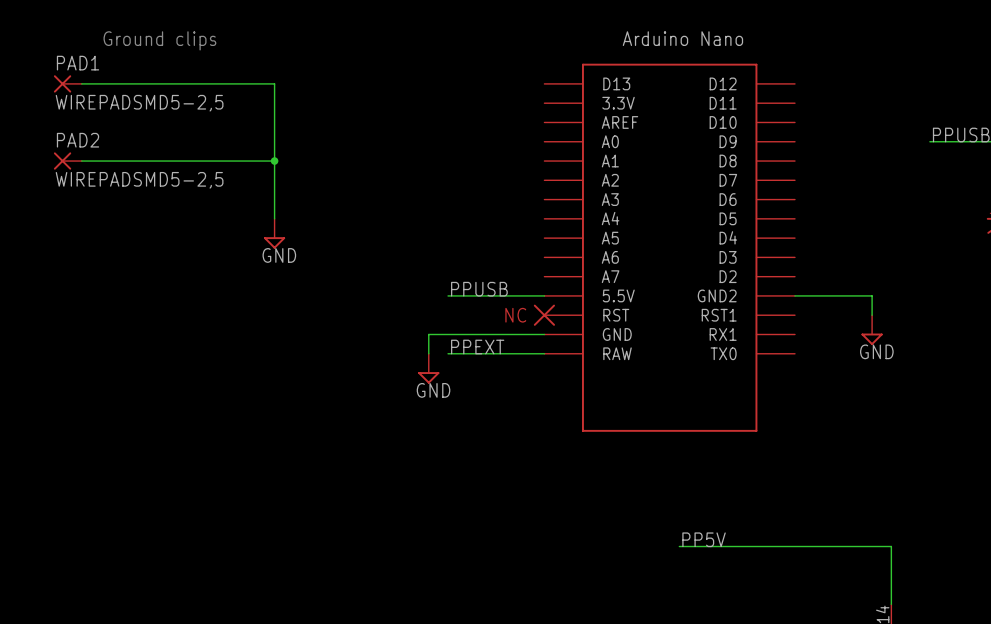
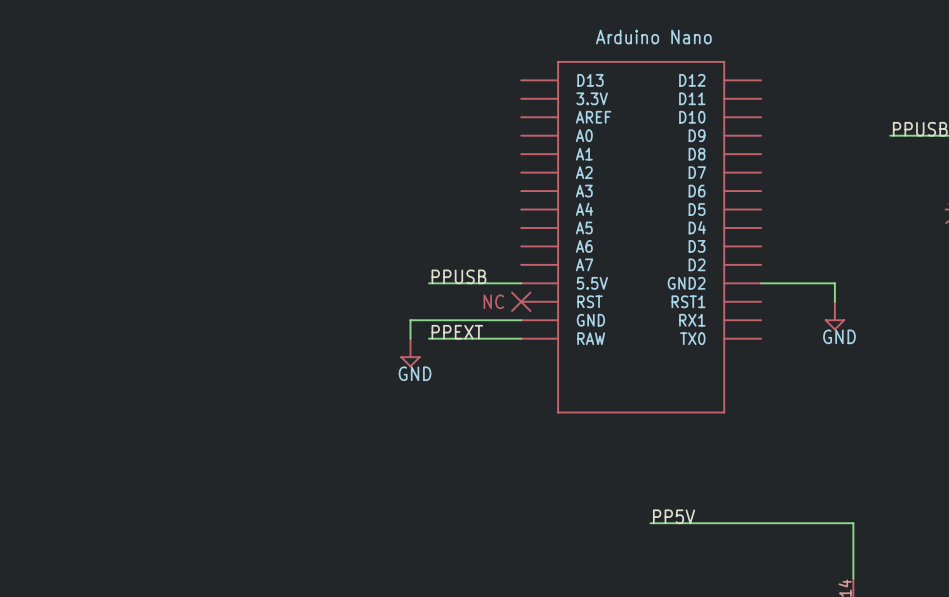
text: Ground clips (159, 40) -> none
PAD1: WIREPADSMD5-2,5 (67, 83) -> none
wire: (81, 83) (274, 83) (274, 218) -> none
PAD2: WIREPADSMD5-2,5 (67, 161) -> none
wire: (81, 161) (274, 161) -> none
junction: (274, 161) -> none
power symbol: GND (274, 233) -> none

